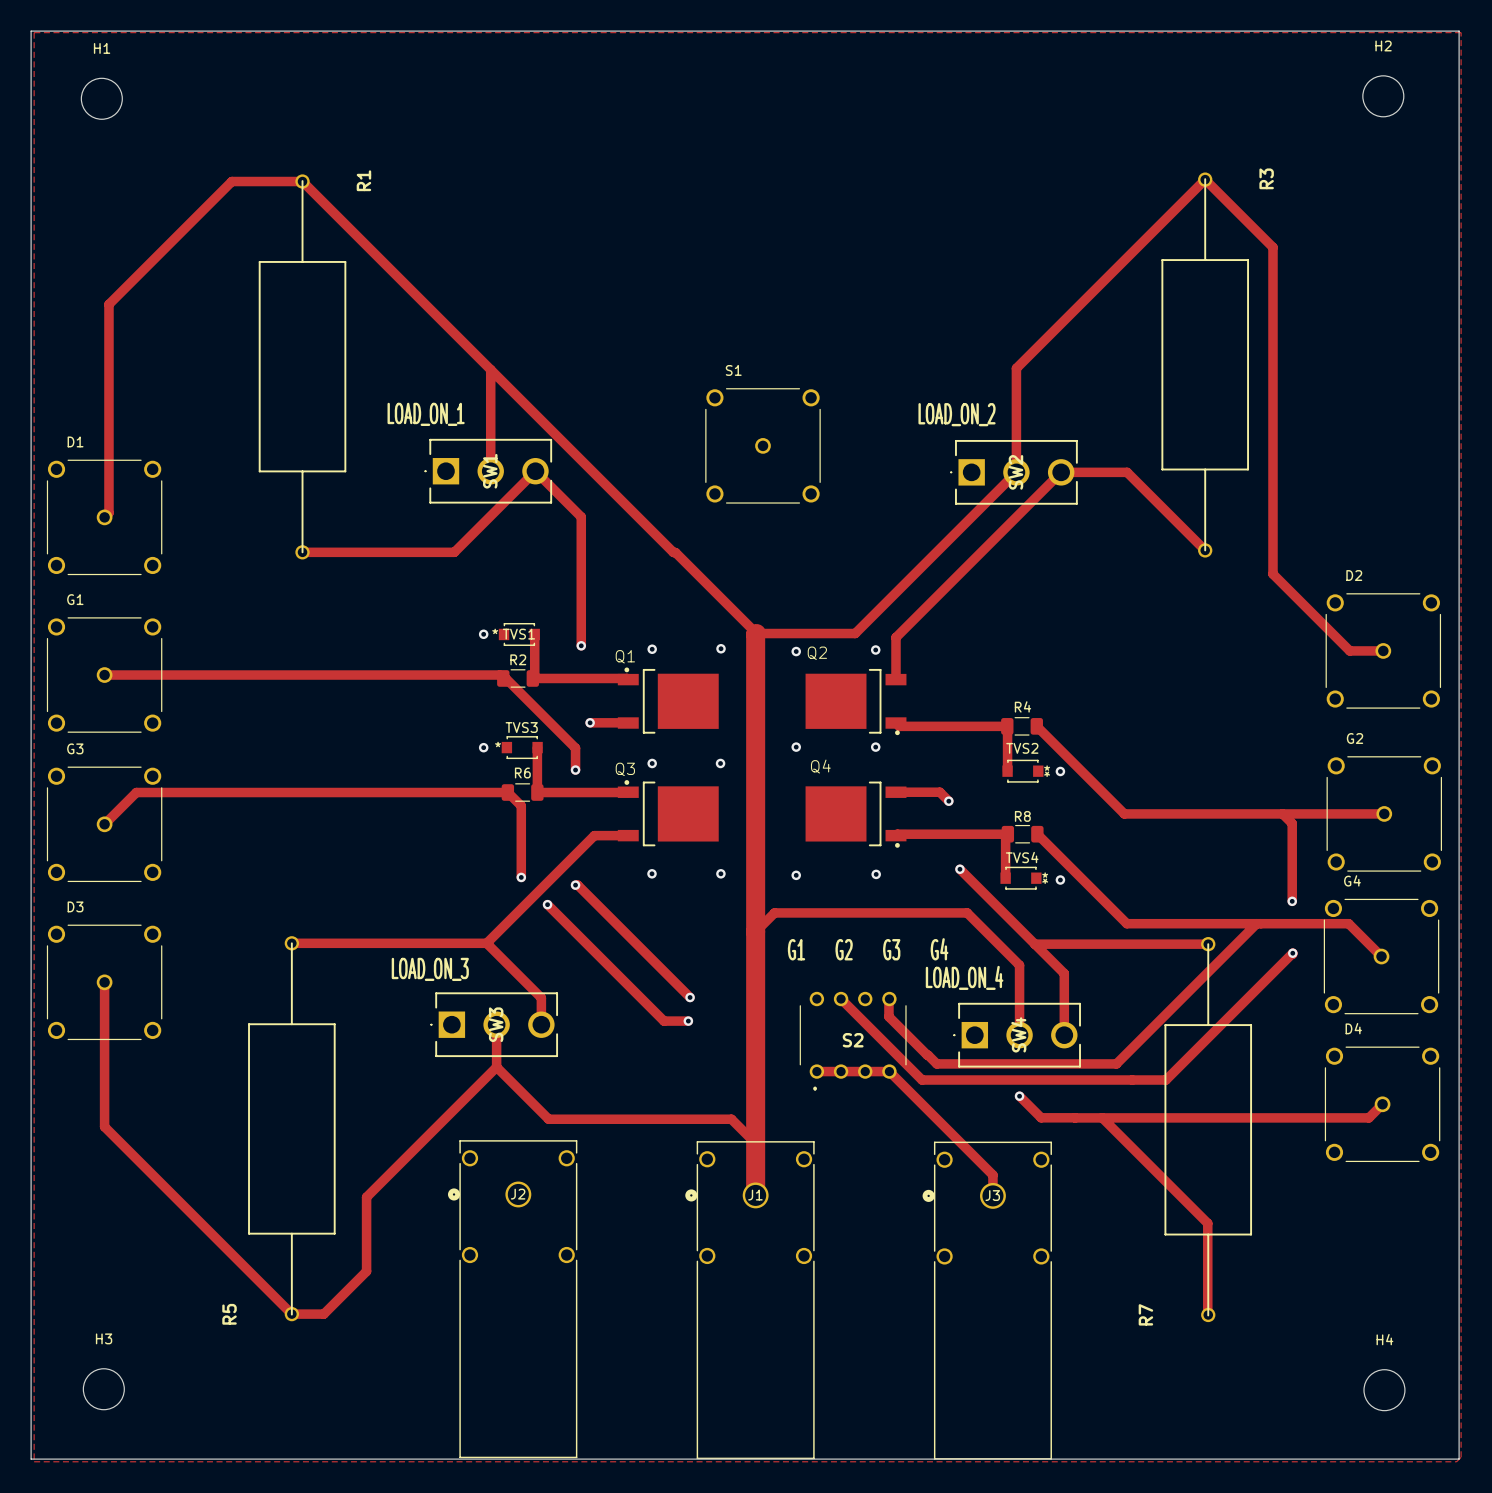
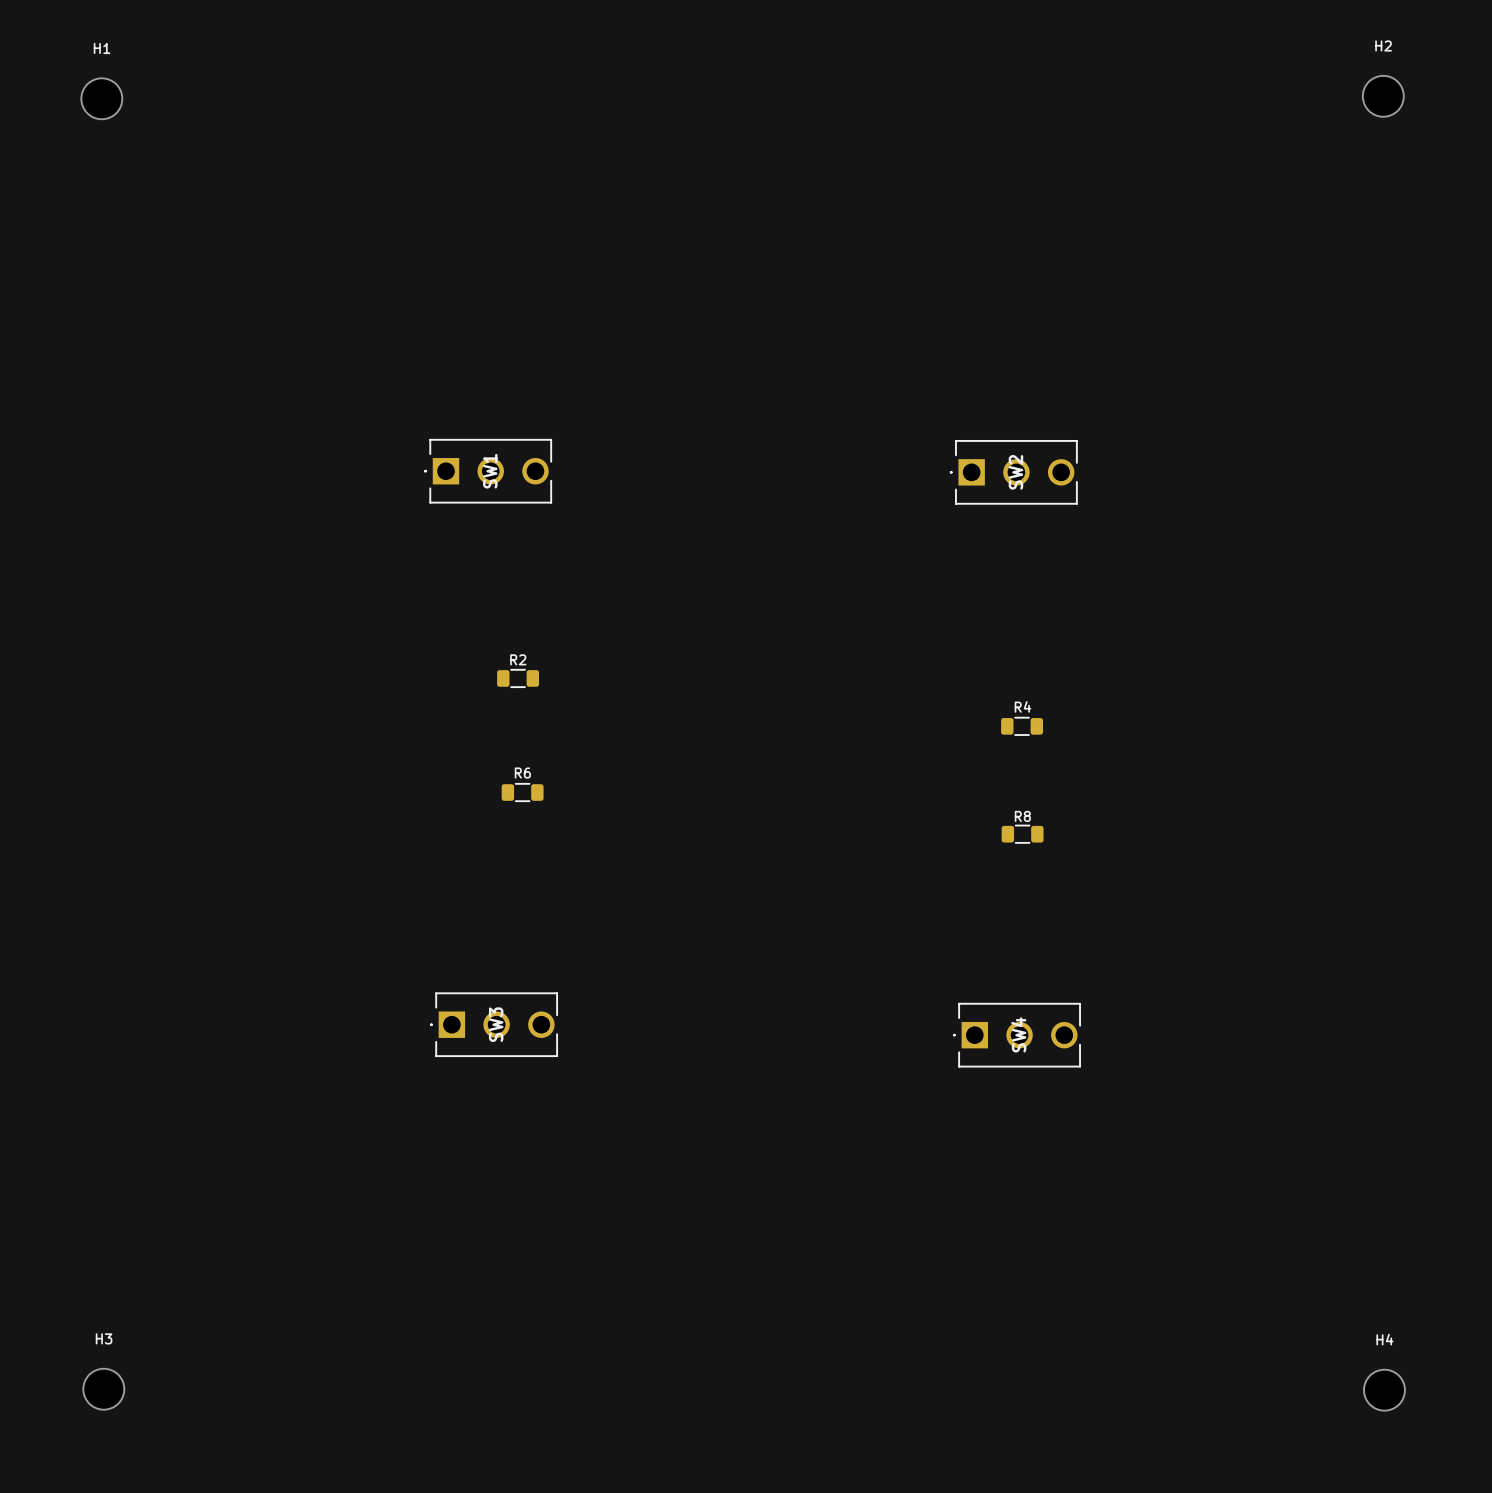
board edge: (31, 31) (1459, 31) (1459, 1459) (31, 1459) (31, 31) -> none
zone outline: (34, 32) (34, 1461) (1456, 1461) (1461, 1457) (1461, 32) (34, 32) -> none
R3: (1205, 365) -> none
R1: (302, 366) -> none
track: (490, 369) (490, 471) -> none
text: LOAD_ON_1 (426, 414) -> none
text: LOAD_ON_2 (957, 414) -> none
S1: (763, 445) -> none
track: (104, 517) (108, 513) (108, 304) (231, 181) (302, 181) (756, 633) -> none
D1: (104, 517) -> none
track: (1205, 550) (1127, 472) (1061, 472) (895, 637) (895, 679) -> none
track: (302, 552) (454, 552) (535, 471) (581, 517) (581, 645) -> none
track: (756, 633) (855, 633) (1016, 472) (1016, 368) (1205, 179) (1272, 247) (1272, 574) (1349, 650) (1383, 650) -> none
track: (756, 633) (755, 1195) (755, 1143) (731, 1119) (548, 1119) (496, 1067) -> none
via: (483, 634) -> none
TVS1: (519, 634) -> none
track: (534, 634) (534, 676) (532, 678) (628, 679) -> none
via: (581, 645) -> none
via: (721, 648) -> none
via: (652, 649) -> none
via: (875, 650) -> none
D2: (1383, 650) -> none
via: (796, 651) -> none
track: (104, 675) (499, 675) (505, 678) (575, 748) (575, 770) -> none
G1: (104, 675) -> none
Q1: (668, 700) -> none
Q2: (856, 702) -> none
track: (590, 722) (628, 723) -> none
via: (590, 722) -> none
track: (895, 723) (899, 726) (1007, 726) (1007, 771) -> none
track: (1036, 726) (1124, 813) (1384, 813) -> none
via: (483, 747) -> none
TVS3: (522, 747) -> none
track: (537, 747) (537, 792) (628, 792) -> none
via: (796, 747) -> none
via: (875, 747) -> none
via: (652, 763) -> none
via: (720, 763) -> none
via: (575, 770) -> none
TVS2: (1022, 771) -> none
via: (1060, 771) -> none
track: (895, 792) (939, 792) (948, 801) -> none
via: (948, 801) -> none
Q3: (668, 813) -> none
track: (1282, 813) (1292, 823) (1292, 901) -> none
G2: (1384, 813) -> none
Q4: (856, 814) -> none
track: (104, 824) (136, 792) (507, 792) (521, 805) (521, 877) -> none
G3: (104, 824) -> none
track: (1036, 833) (1126, 923) (1348, 923) (1381, 956) -> none
track: (628, 835) (594, 835) (486, 943) -> none
track: (895, 835) (1007, 834) (1005, 836) (1005, 878) -> none
track: (959, 869) (1064, 973) (1064, 1035) -> none
via: (959, 869) -> none
via: (652, 873) -> none
via: (720, 873) -> none
via: (876, 874) -> none
via: (796, 875) -> none
via: (521, 877) -> none
TVS4: (1020, 878) -> none
via: (1060, 880) -> none
track: (575, 885) (577, 885) (690, 997) -> none
via: (575, 885) -> none
via: (1292, 901) -> none
track: (547, 904) (663, 1021) (688, 1021) -> none
via: (547, 904) -> none
track: (1256, 923) (1116, 1063) (936, 1063) (888, 1016) (889, 999) -> none
track: (755, 931) (774, 912) (967, 912) (1019, 965) (1019, 1035) -> none
track: (291, 943) (486, 943) -> none
track: (486, 943) (541, 997) (541, 1024) -> none
track: (1034, 944) (1208, 944) -> none
text: G1 G2 G3 G4 (868, 949) -> none
via: (1292, 953) -> none
track: (1292, 954) (1165, 1080) (922, 1080) (841, 999) -> none
G4: (1381, 956) -> none
text: LOAD_ON_3 (430, 969) -> none
text: LOAD_ON_4 (964, 977) -> none
track: (104, 982) (104, 1126) (291, 1314) (323, 1314) (366, 1271) (366, 1197) (496, 1067) -> none
D3: (104, 982) -> none
via: (690, 997) -> none
via: (688, 1021) -> none
track: (496, 1024) (496, 1067) -> none
S2: (853, 1041) -> none
track: (816, 1071) (889, 1071) (992, 1175) (992, 1195) -> none
track: (1019, 1096) (1041, 1117) (1075, 1117) -> none
via: (1019, 1096) -> none
track: (1382, 1104) (1368, 1117) (1075, 1117) -> none
D4: (1382, 1104) -> none
track: (1102, 1117) (1207, 1223) (1208, 1314) -> none
R5: (291, 1128) -> none
R7: (1208, 1129) -> none
J2: (512, 1299) -> none
J1: (749, 1300) -> none
J3: (987, 1300) -> none

